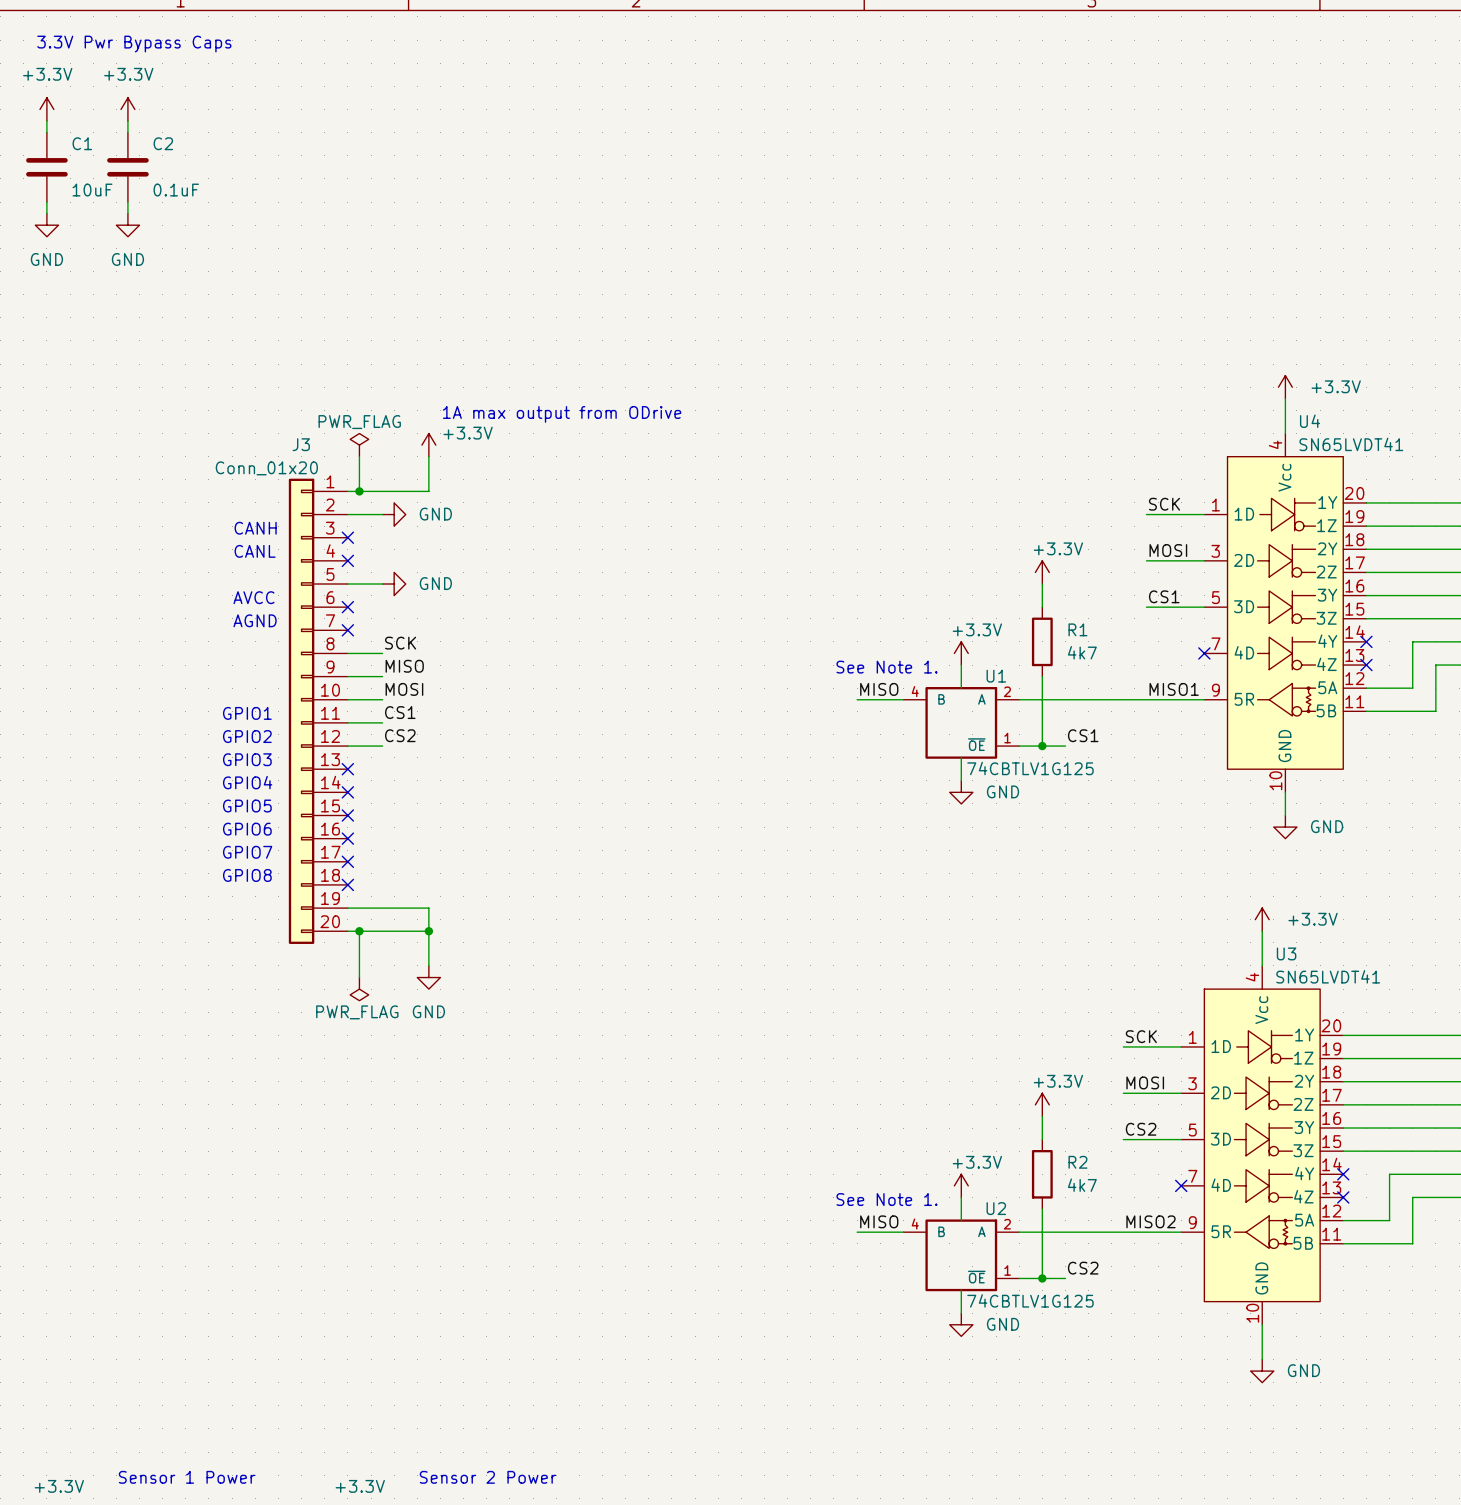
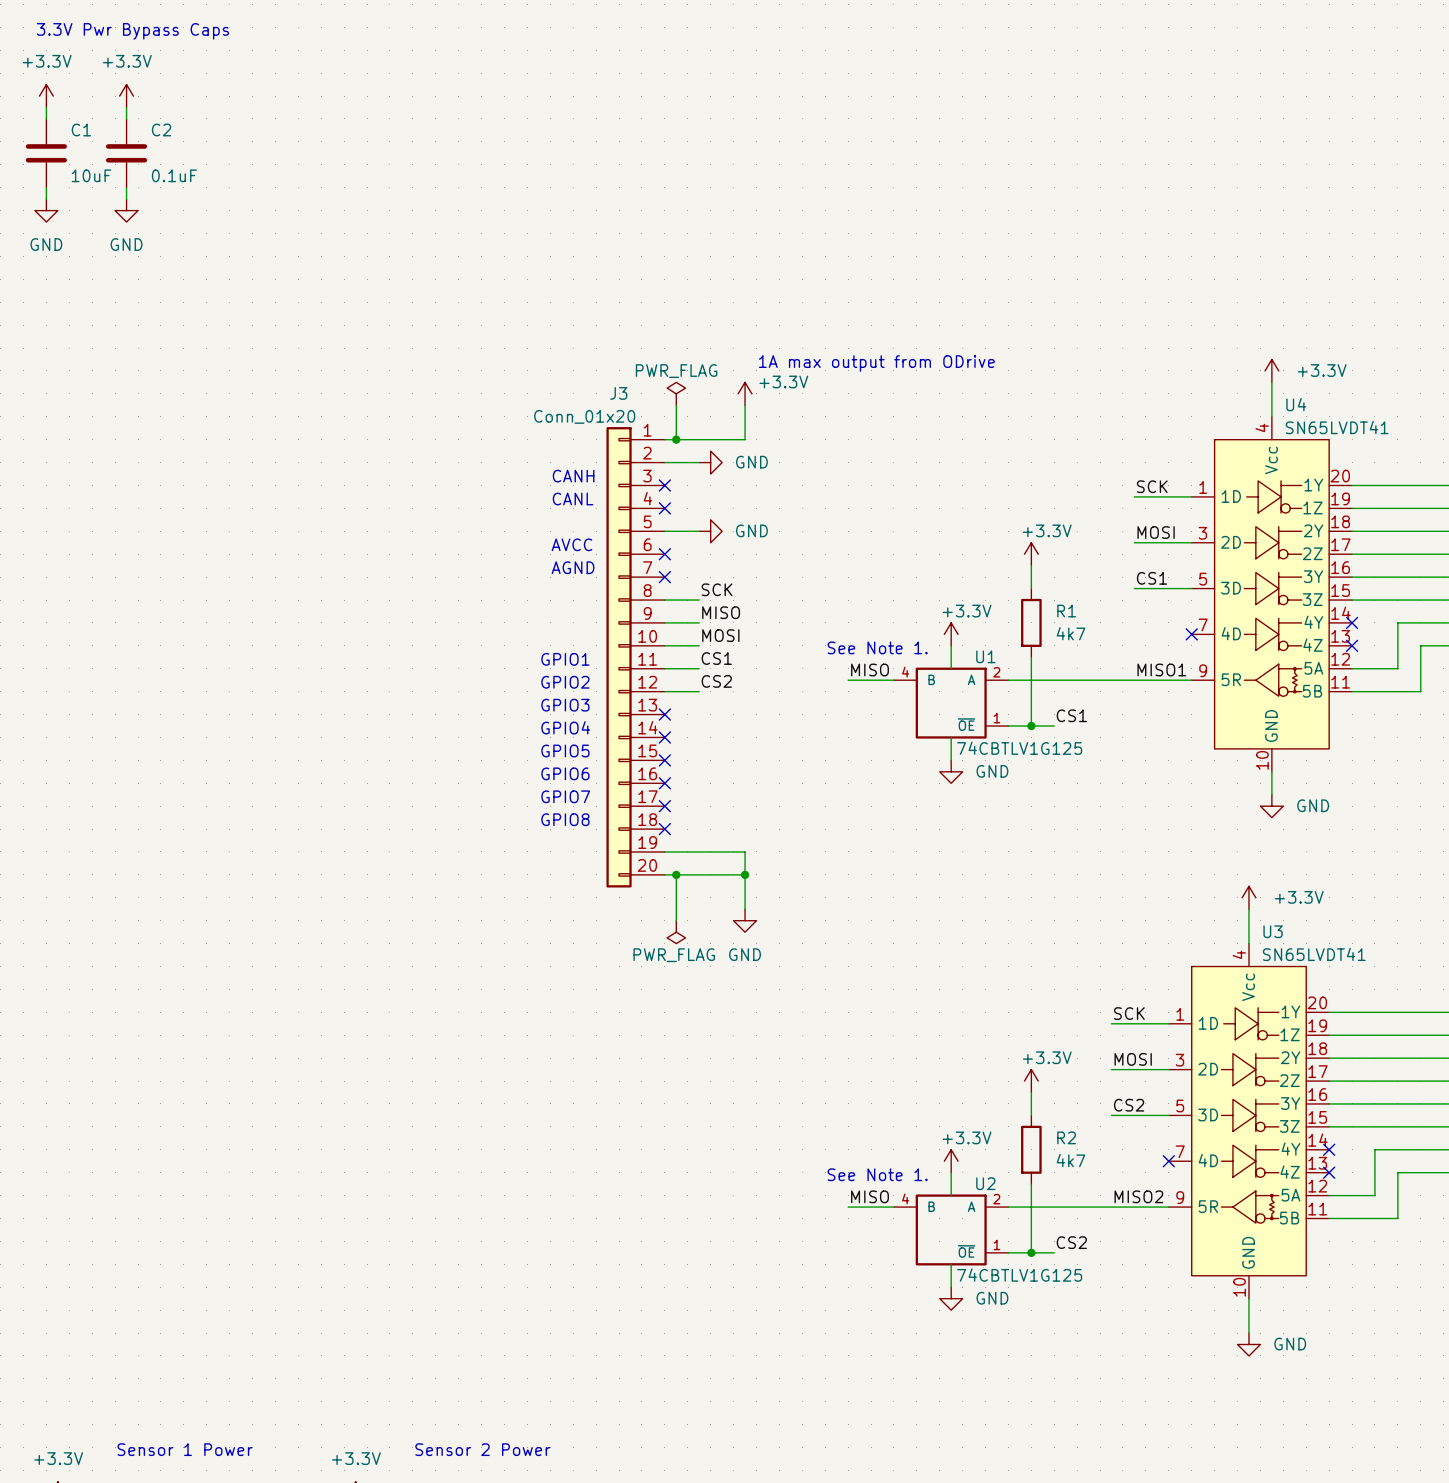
text: none -> 1A max output from ODrive (876, 363)
power symbol: none -> PWR_FLAG (676, 393)
power symbol: none -> +3.3V (745, 393)
text: 1A max output from ODrive (562, 414) -> none
wire: none -> (676, 405) (676, 439)
wire: none -> (745, 405) (745, 439) (664, 439)
power symbol: PWR_FLAG (359, 445) -> none
power symbol: +3.3V (428, 445) -> none
wire: (359, 456) (359, 491) -> none
wire: (428, 456) (428, 491) (347, 491) -> none
junction: none -> (676, 439)
wire: none -> (664, 462) (699, 462)
power symbol: none -> GND (710, 462)
junction: (359, 491) -> none
text: none -> CANH (573, 476)
no-connect mark: none -> (664, 485)
wire: (347, 514) (382, 514) -> none
power symbol: GND (394, 514) -> none
text: none -> CANL (573, 499)
no-connect mark: none -> (664, 508)
text: CANH (255, 528) -> none
no-connect mark: (347, 537) -> none
wire: none -> (664, 531) (699, 531)
power symbol: none -> GND (710, 531)
text: CANL (255, 551) -> none
no-connect mark: (347, 560) -> none
text: none -> AVCC (571, 544)
no-connect mark: none -> (664, 554)
wire: (347, 584) (382, 584) -> none
power symbol: GND (394, 584) -> none
text: none -> AGND (573, 567)
no-connect mark: none -> (664, 577)
text: AVCC (253, 597) -> none
no-connect mark: (347, 607) -> none
label: none -> SCK (717, 589)
wire: none -> (664, 600) (699, 600)
text: AGND (255, 620) -> none
no-connect mark: (347, 630) -> none
label: none -> MISO (721, 612)
wire: none -> (664, 622) (699, 622)
label: SCK (400, 643) -> none
wire: (347, 653) (382, 653) -> none
label: none -> MOSI (720, 635)
wire: none -> (664, 645) (699, 645)
label: MISO (404, 666) -> none
wire: (347, 676) (382, 676) -> none
label: none -> CS1 (716, 658)
text: none -> GPIO1 (565, 659)
wire: none -> (664, 668) (699, 668)
label: MOSI (404, 689) -> none
wire: (347, 699) (382, 699) -> none
label: none -> CS2 (716, 681)
text: none -> GPIO2 (565, 682)
J3 position: (318, 711) -> (635, 657)
wire: none -> (664, 691) (699, 691)
label: CS1 (400, 712) -> none
text: GPIO1 (247, 713) -> none
wire: (347, 722) (382, 722) -> none
text: none -> GPIO3 (565, 705)
no-connect mark: none -> (664, 714)
label: CS2 (400, 735) -> none
text: GPIO2 (247, 736) -> none
wire: (347, 746) (382, 746) -> none
text: none -> GPIO4 (565, 727)
no-connect mark: none -> (664, 737)
text: GPIO3 (247, 759) -> none
no-connect mark: (347, 769) -> none
text: none -> GPIO5 (565, 750)
no-connect mark: none -> (664, 760)
text: GPIO4 (247, 782) -> none
no-connect mark: (347, 792) -> none
text: none -> GPIO6 (565, 773)
no-connect mark: none -> (664, 783)
text: GPIO5 (247, 806) -> none
no-connect mark: (347, 815) -> none
text: none -> GPIO7 (565, 796)
no-connect mark: none -> (664, 806)
text: GPIO6 (247, 829) -> none
no-connect mark: (347, 838) -> none
text: none -> GPIO8 (565, 819)
no-connect mark: none -> (664, 829)
text: GPIO7 (247, 852) -> none
no-connect mark: (347, 861) -> none
wire: none -> (664, 851) (745, 851) (745, 909)
text: GPIO8 (247, 875) -> none
no-connect mark: (347, 884) -> none
wire: none -> (664, 874) (745, 874)
wire: none -> (676, 874) (676, 920)
junction: none -> (676, 874)
junction: none -> (745, 874)
wire: (347, 908) (428, 908) (428, 965) -> none
wire: (347, 931) (428, 931) -> none
wire: (359, 931) (359, 977) -> none
junction: (359, 931) -> none
junction: (428, 931) -> none
power symbol: none -> GND (745, 920)
power symbol: none -> PWR_FLAG (676, 932)
power symbol: GND (428, 977) -> none
power symbol: PWR_FLAG (359, 989) -> none

